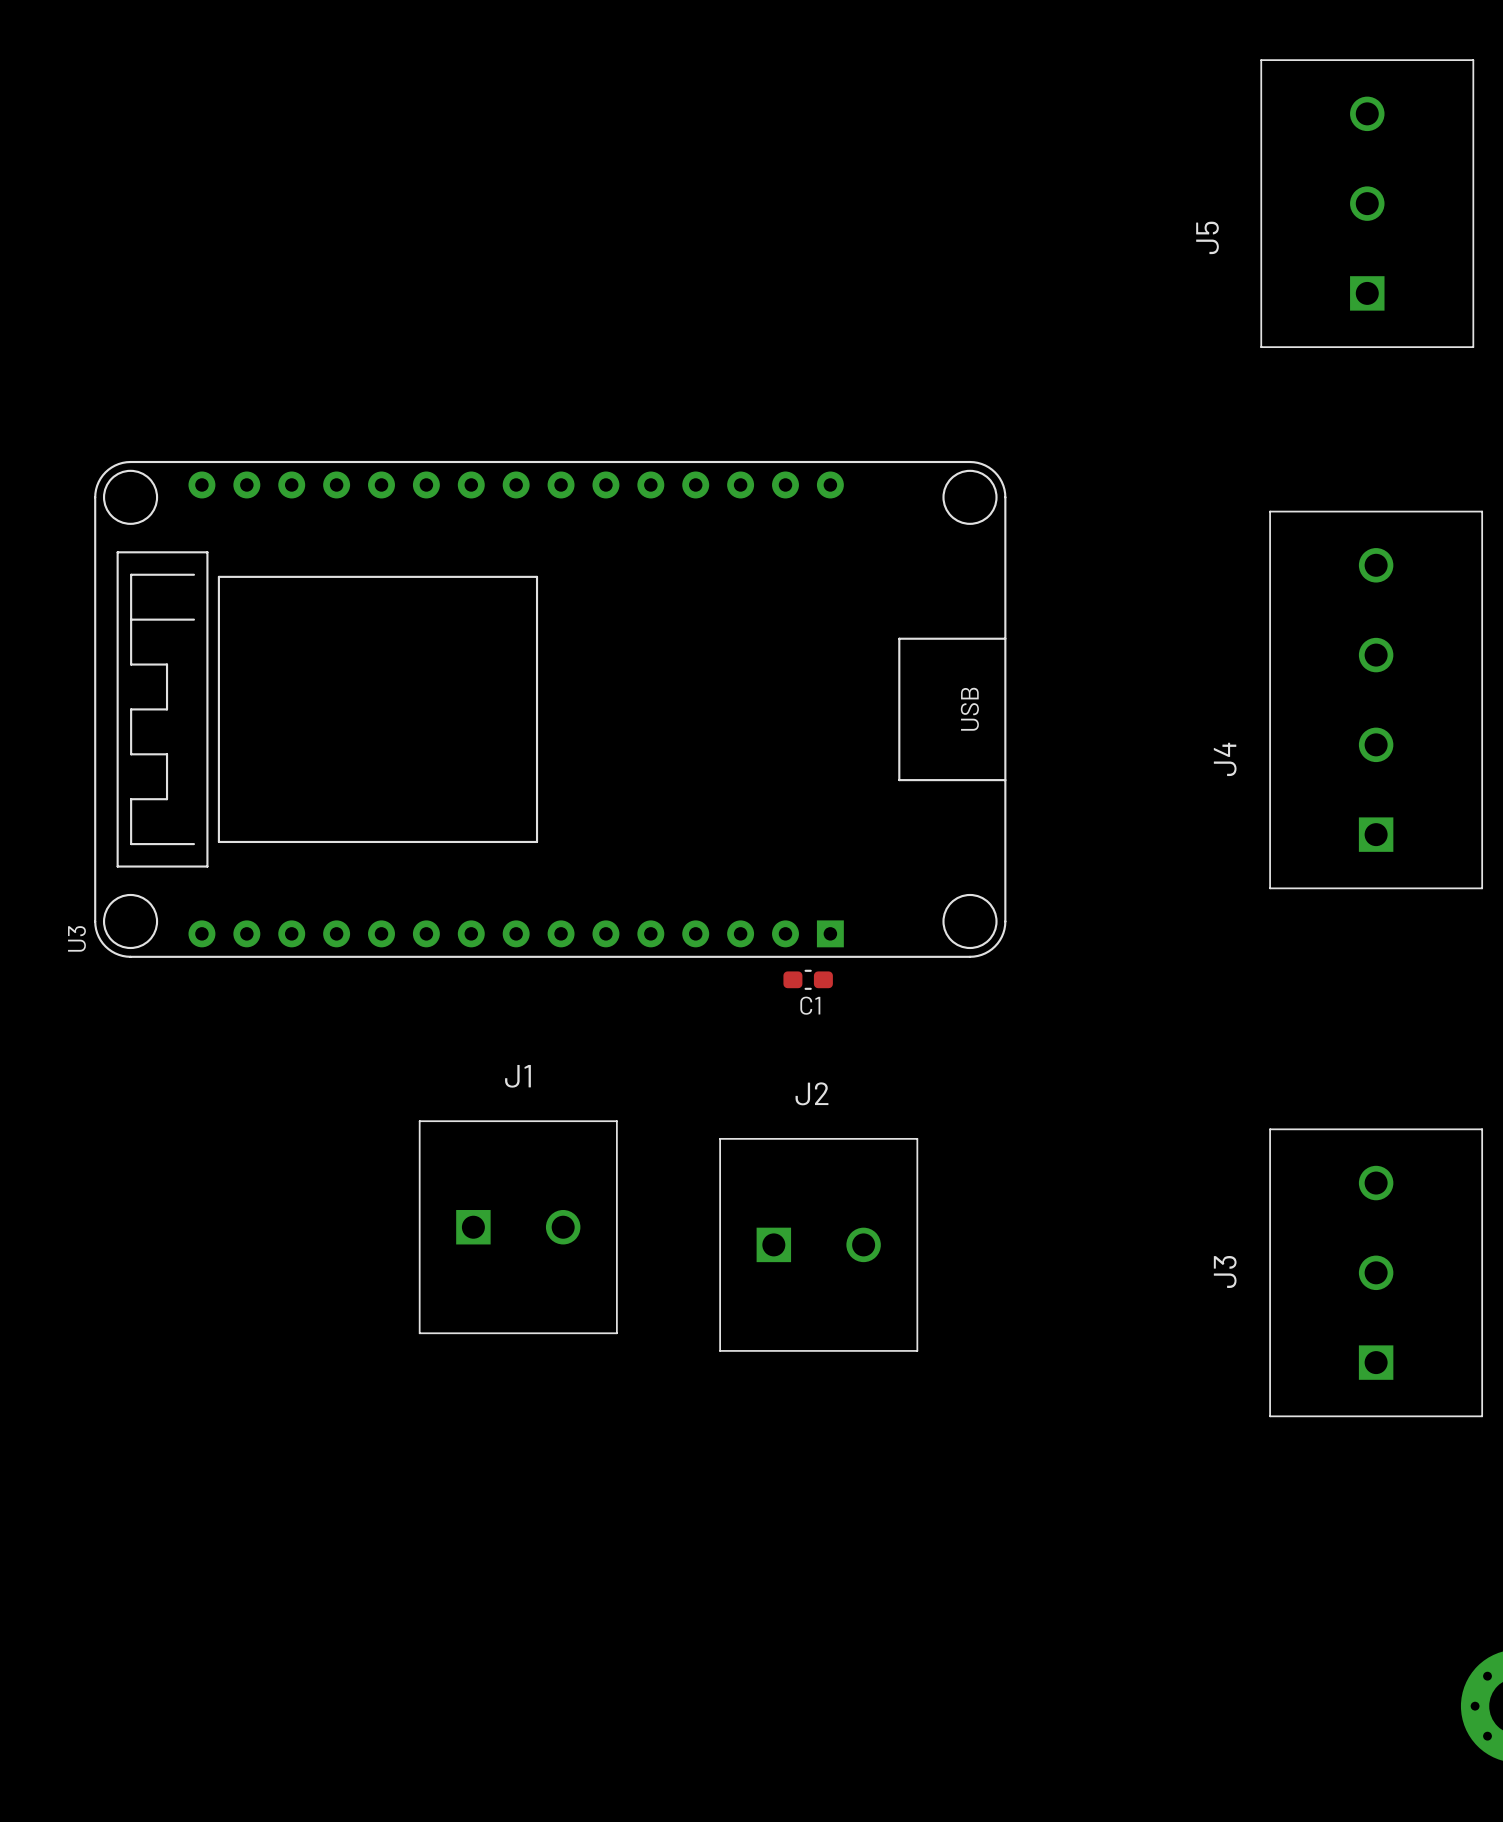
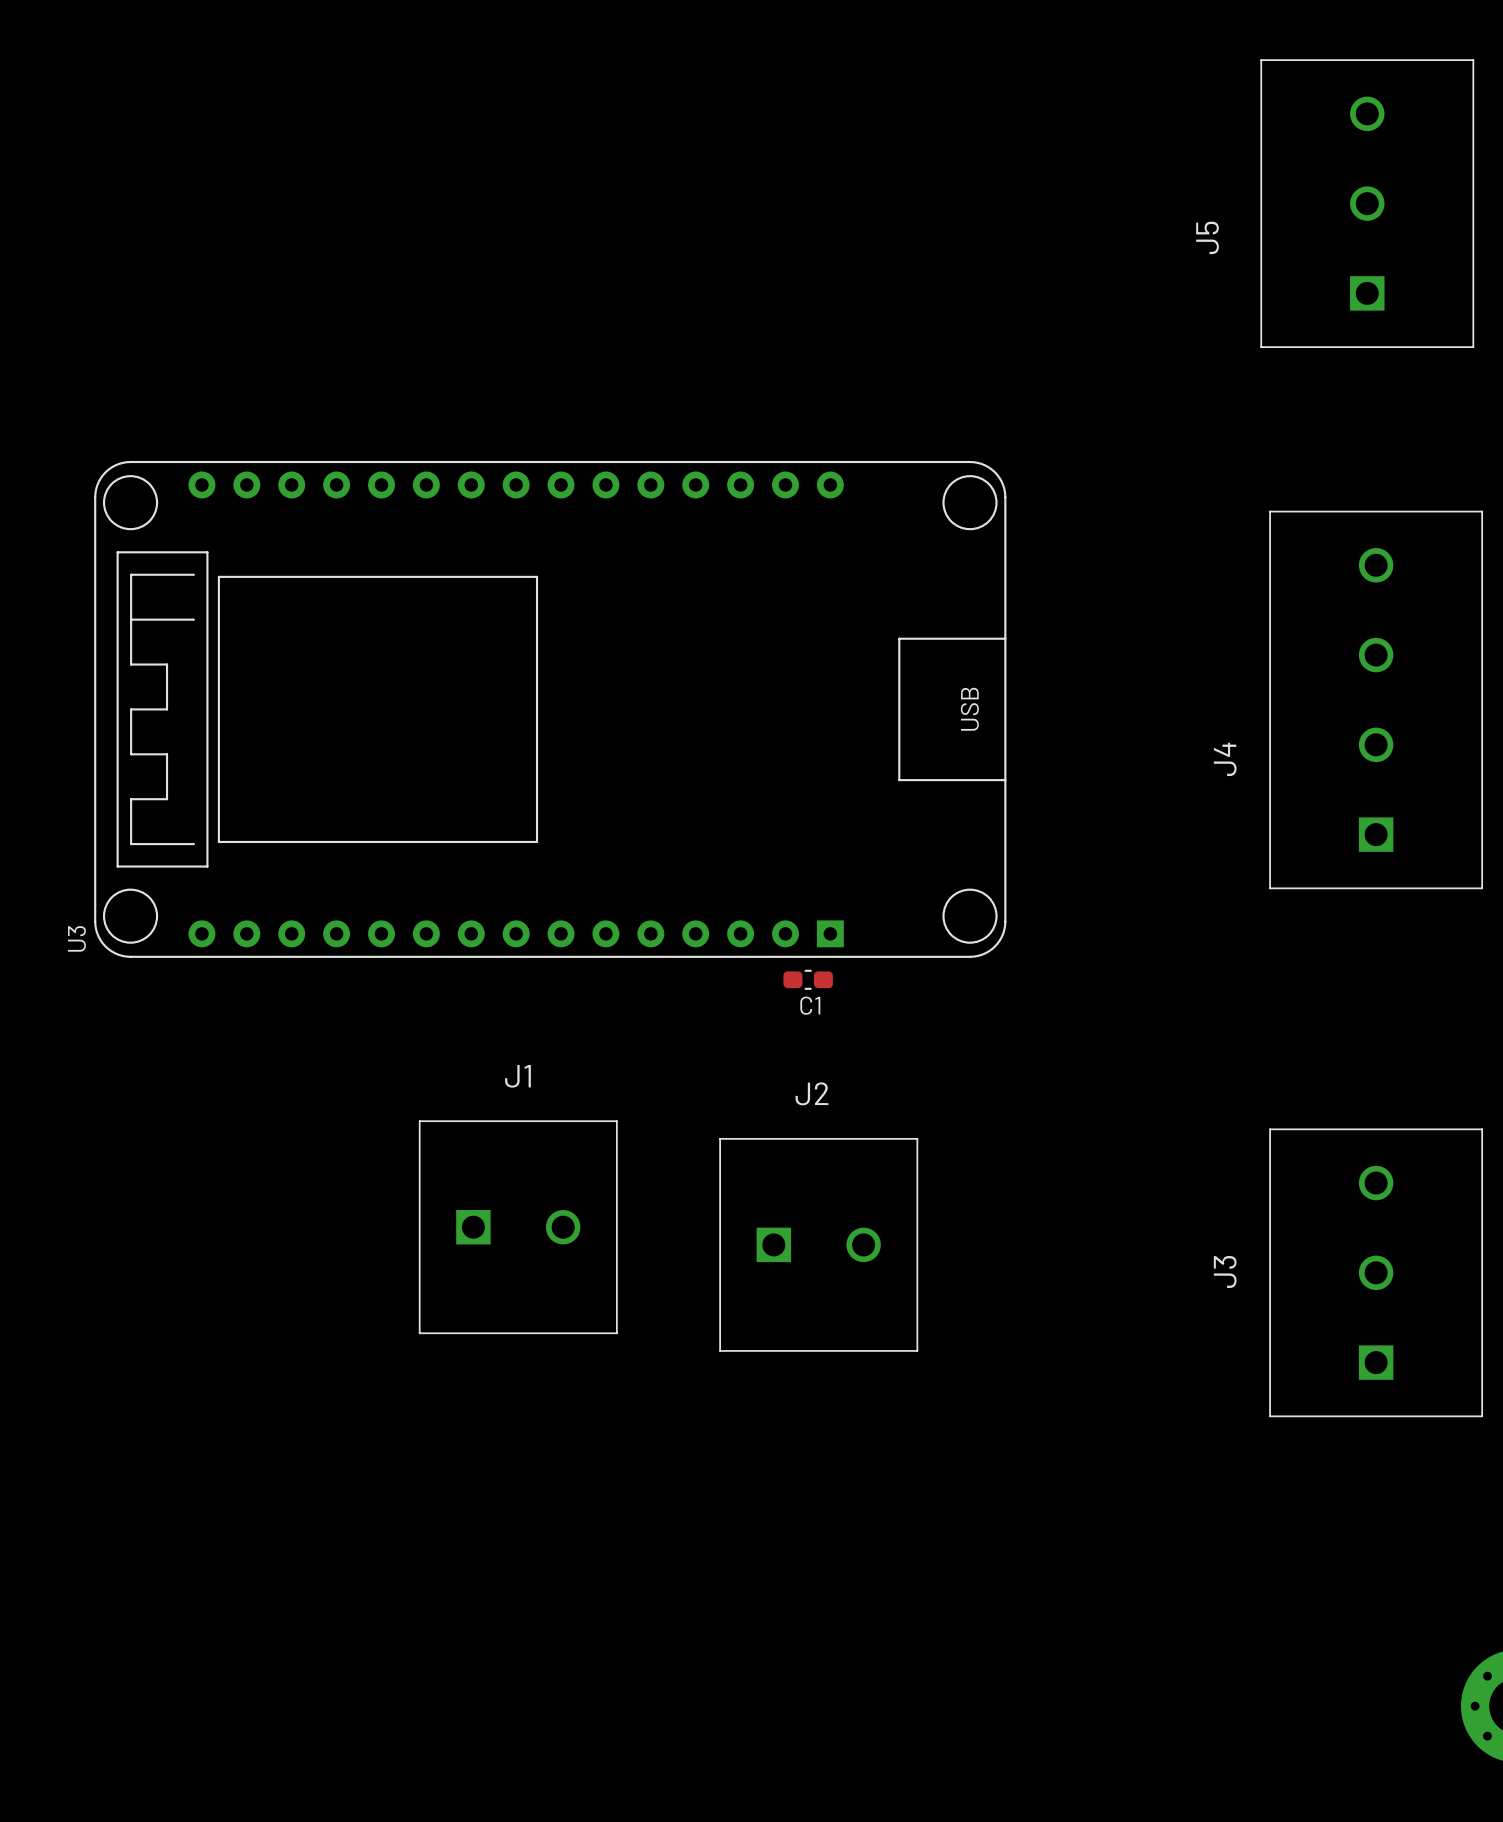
U3 footprint: [94, 460, 1007, 958] -> [94, 460, 1007, 958]

